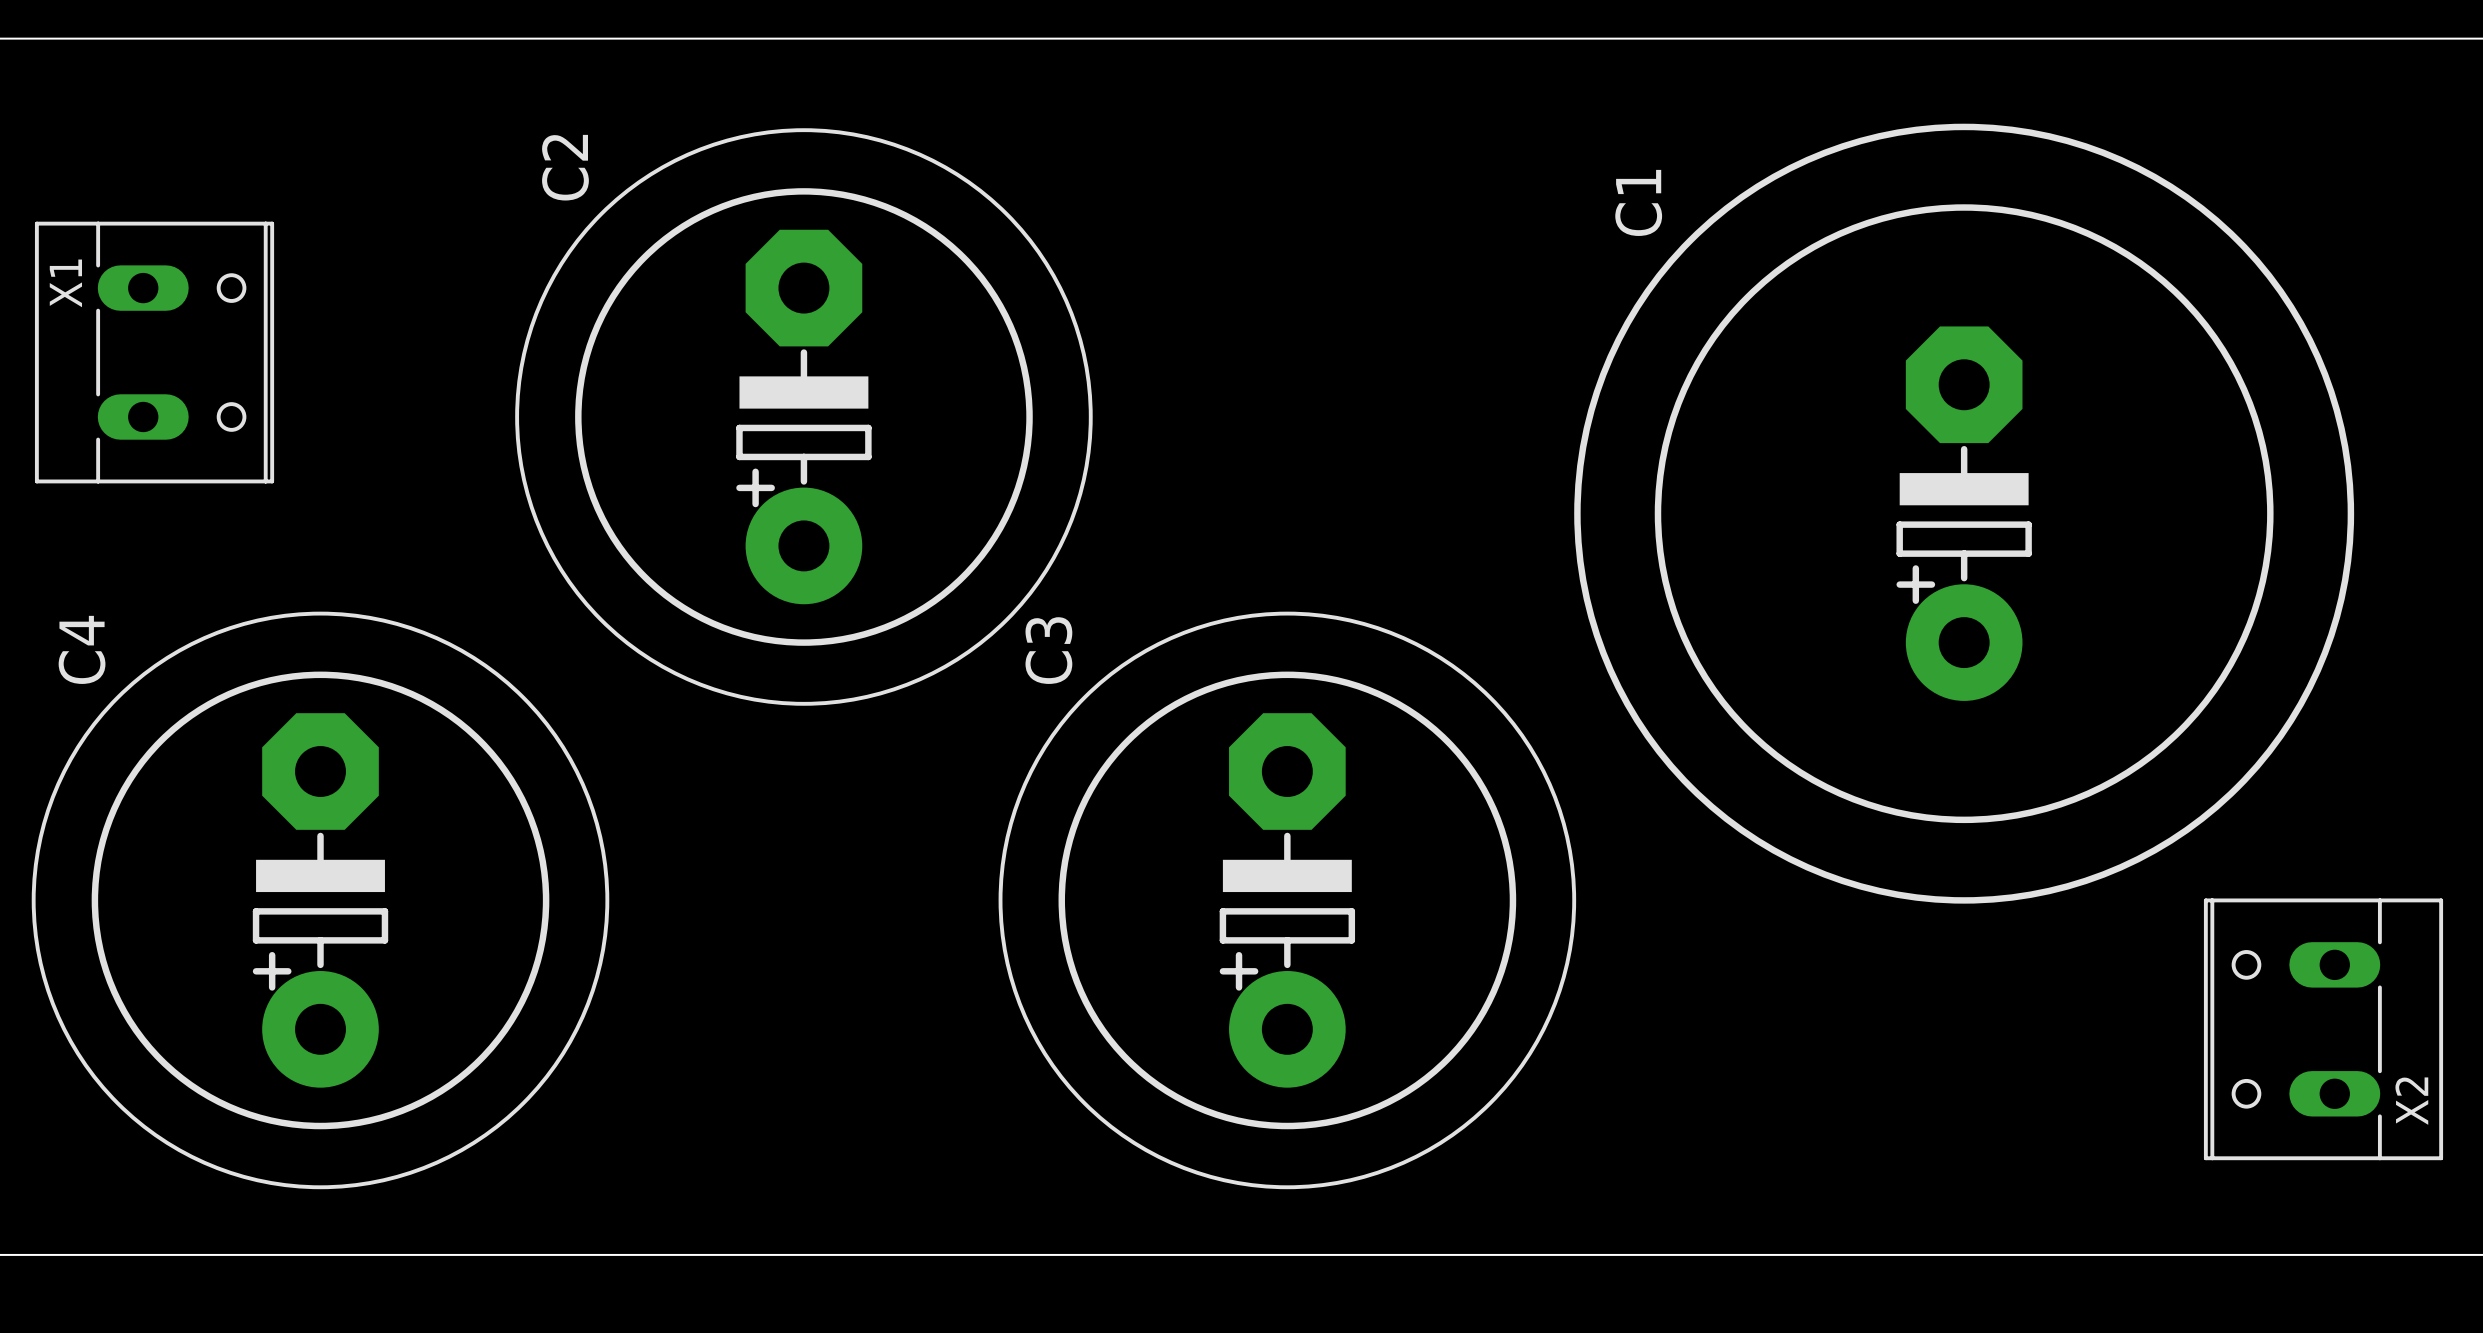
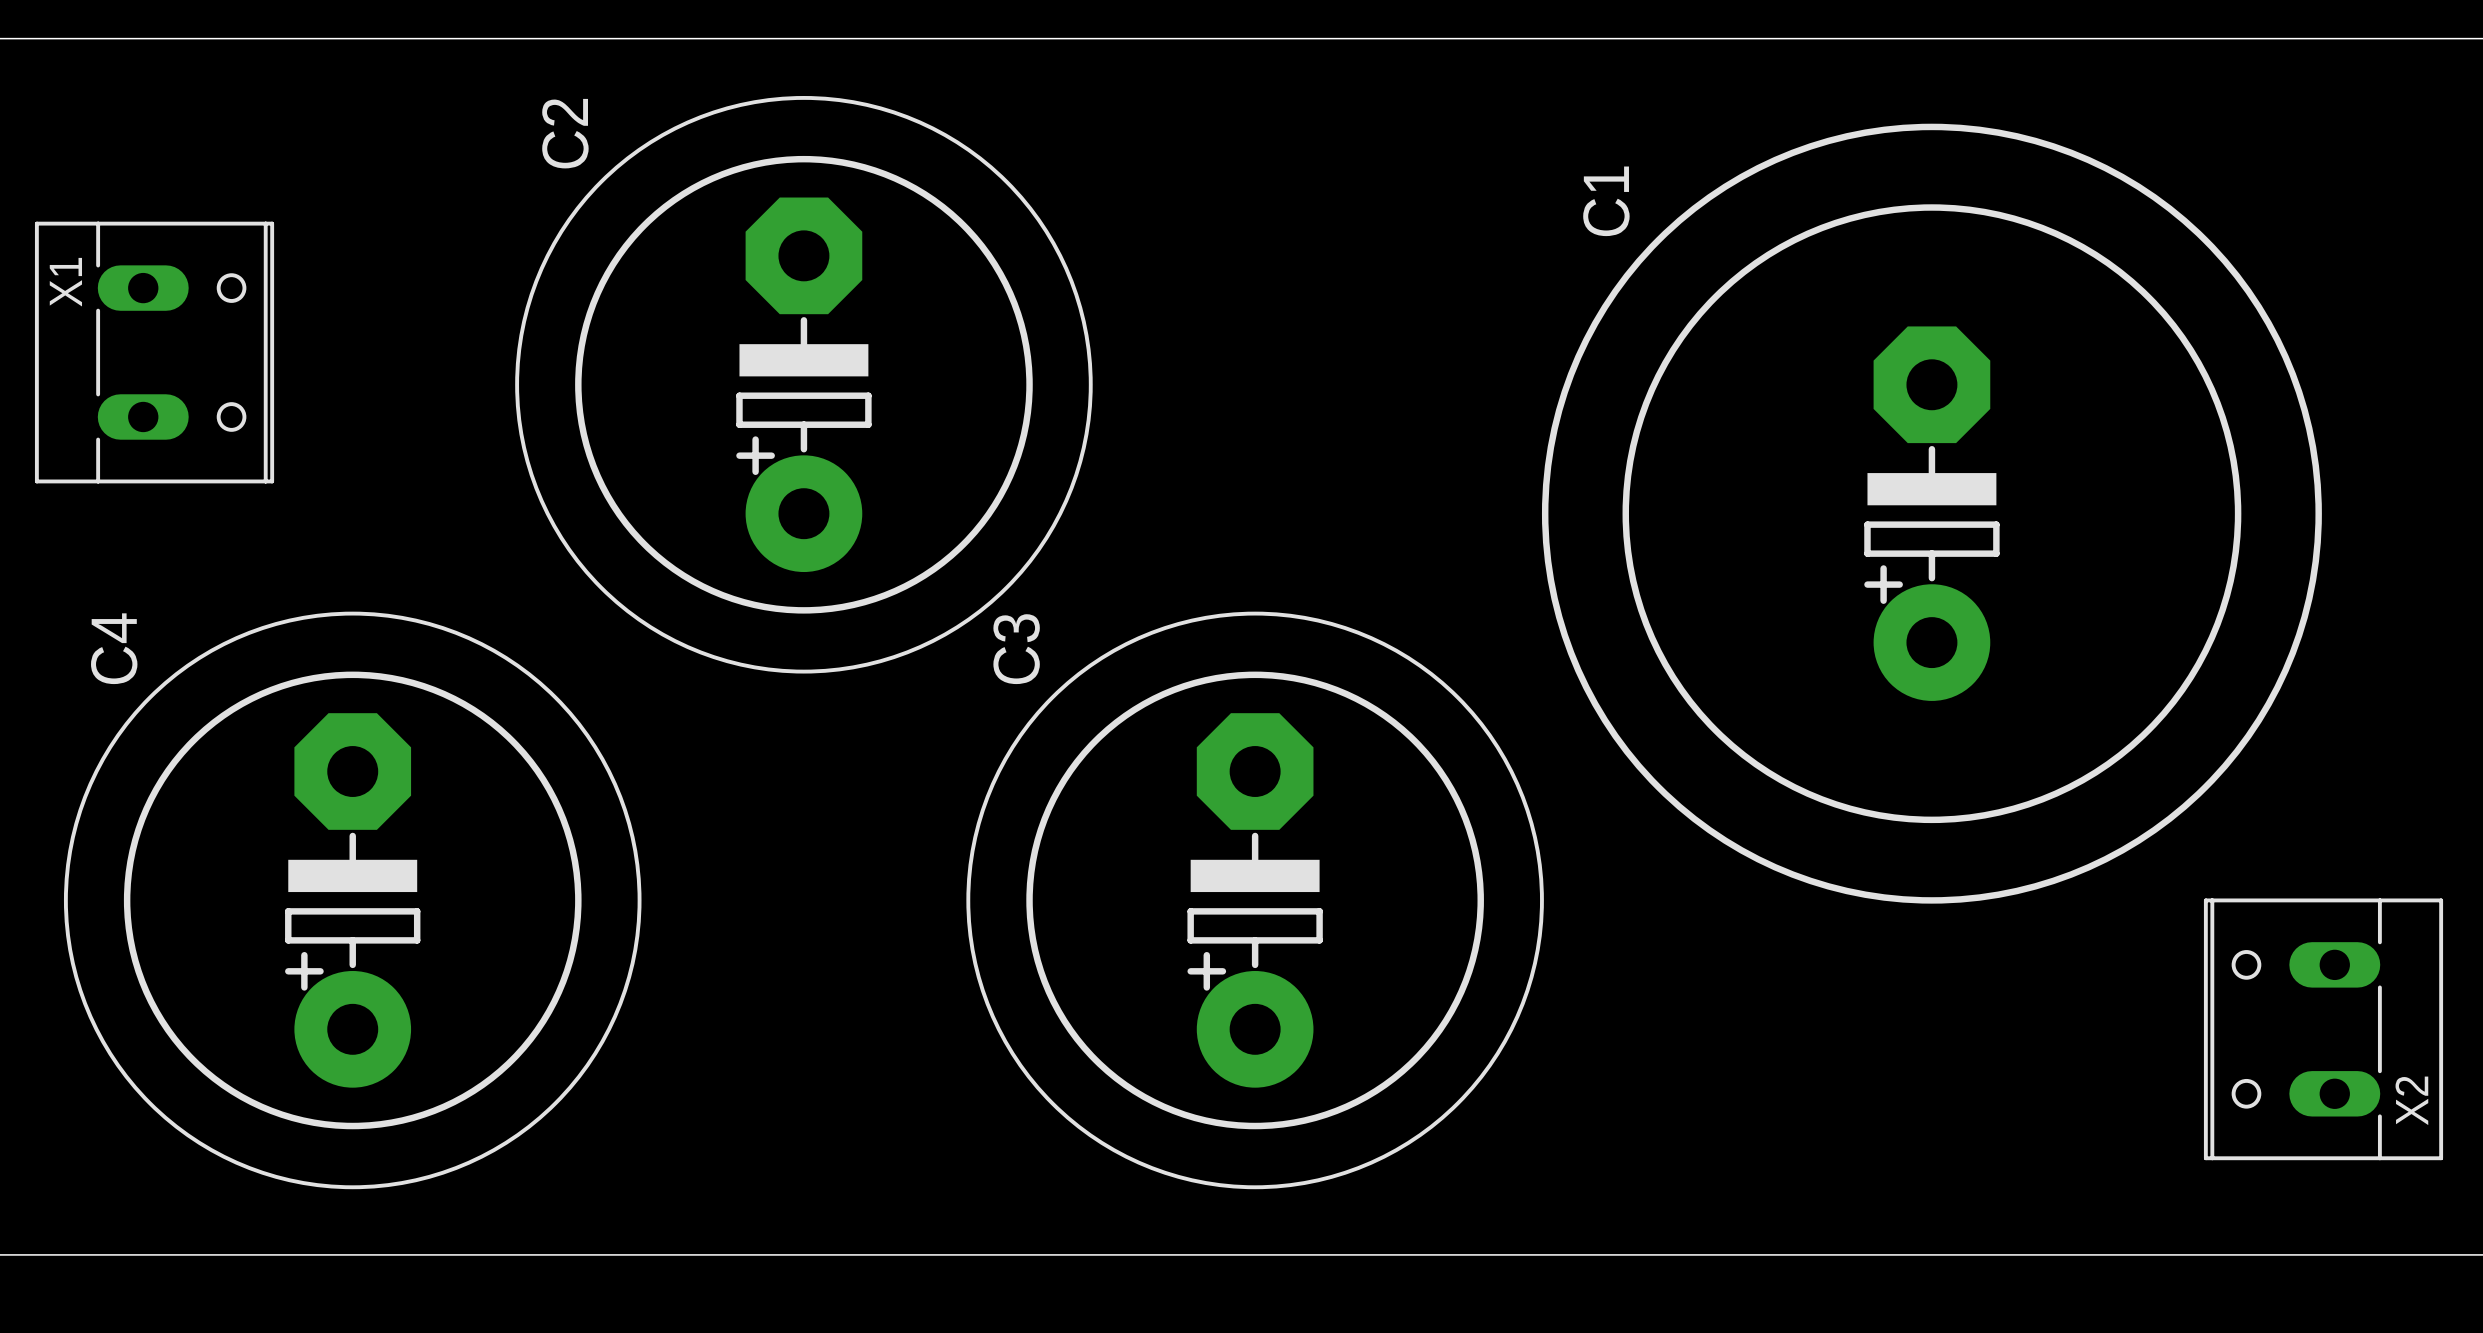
C2 position: (803, 416) -> (803, 384)
C1 position: (1964, 513) -> (1931, 513)
C4 position: (320, 900) -> (352, 900)
C3 position: (1287, 900) -> (1255, 900)

